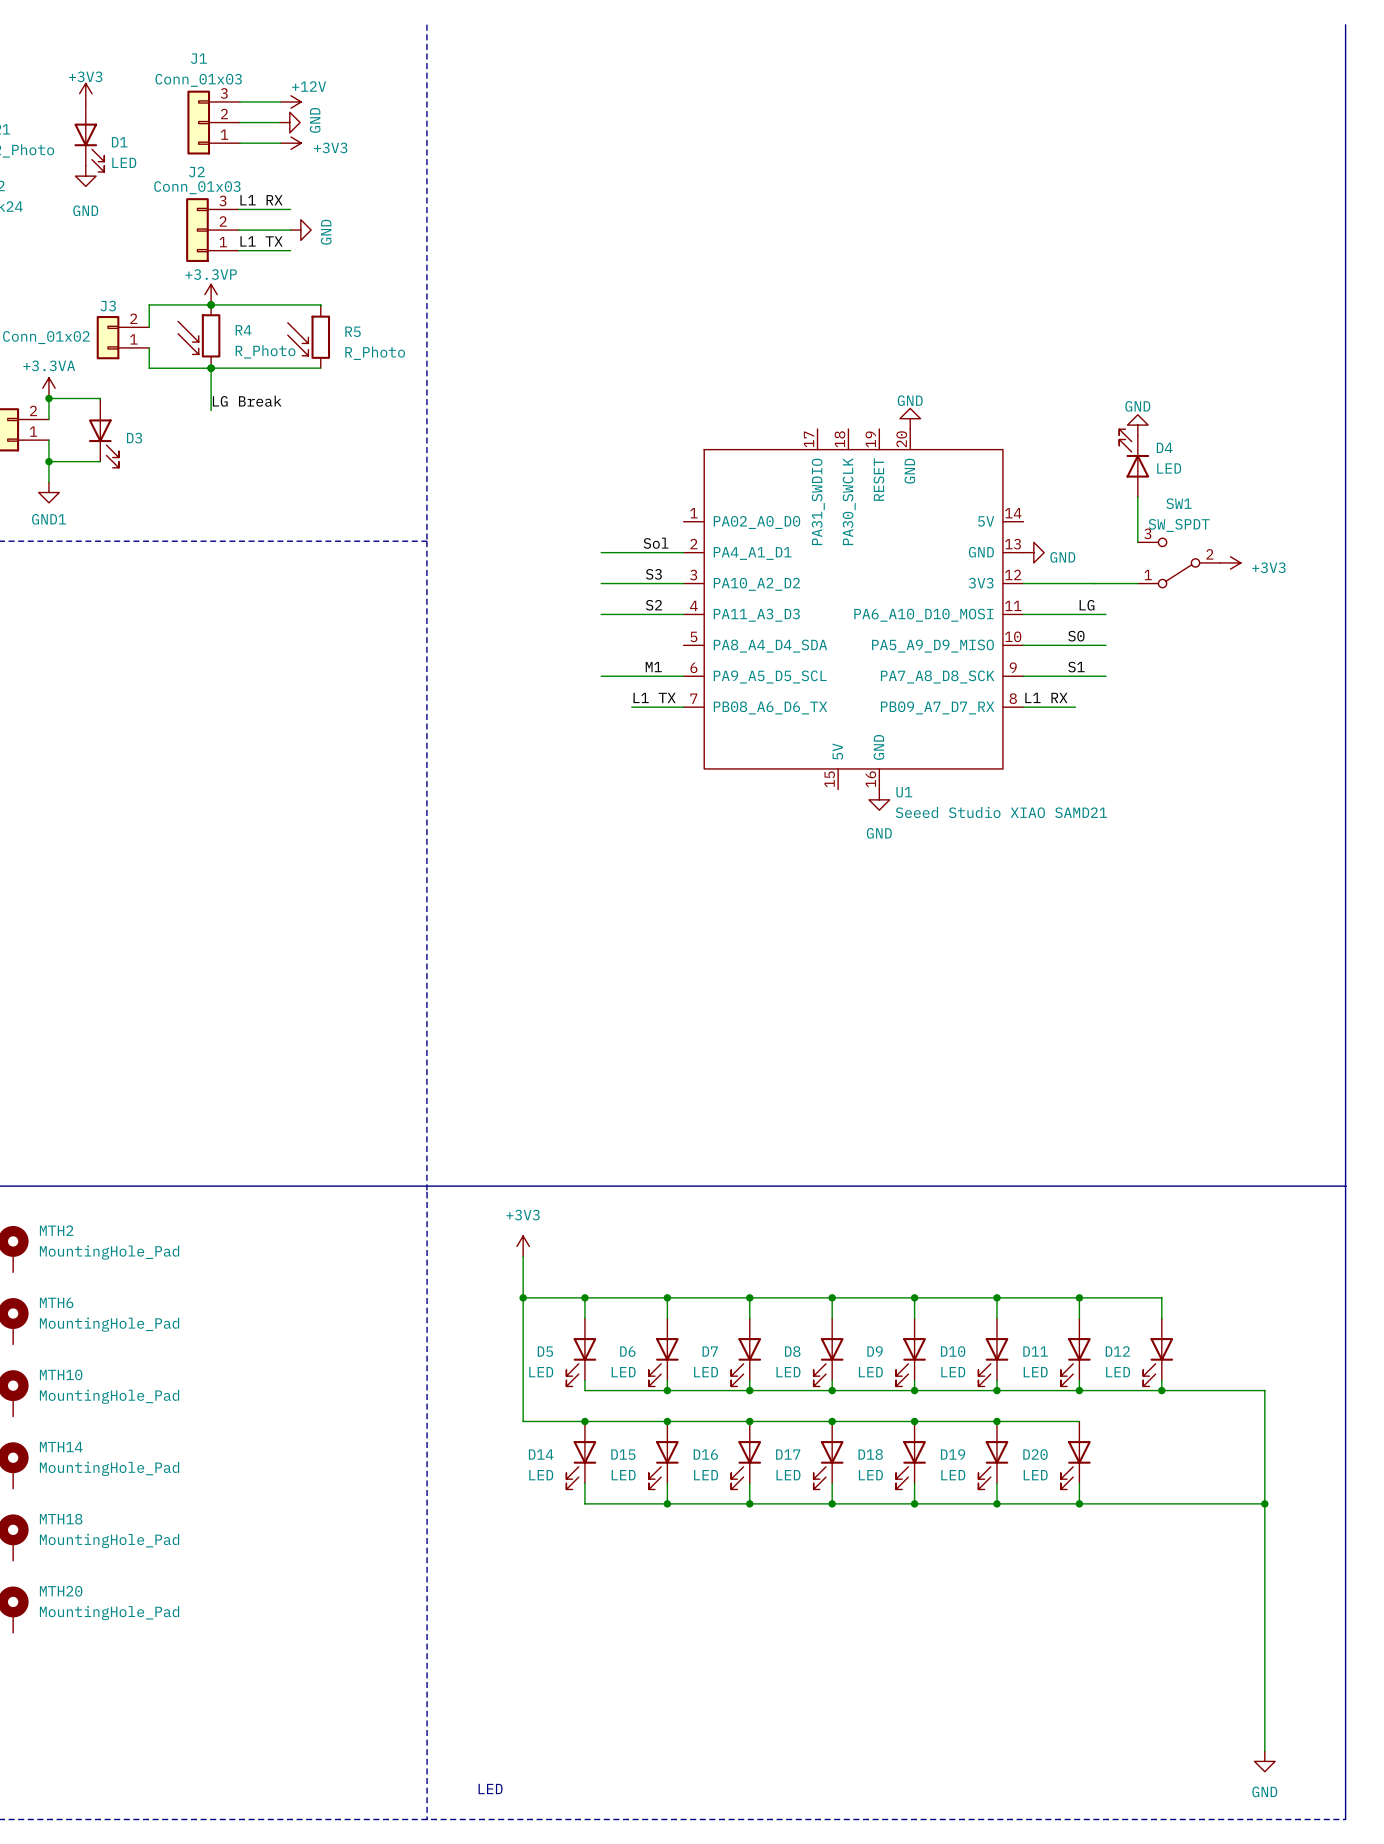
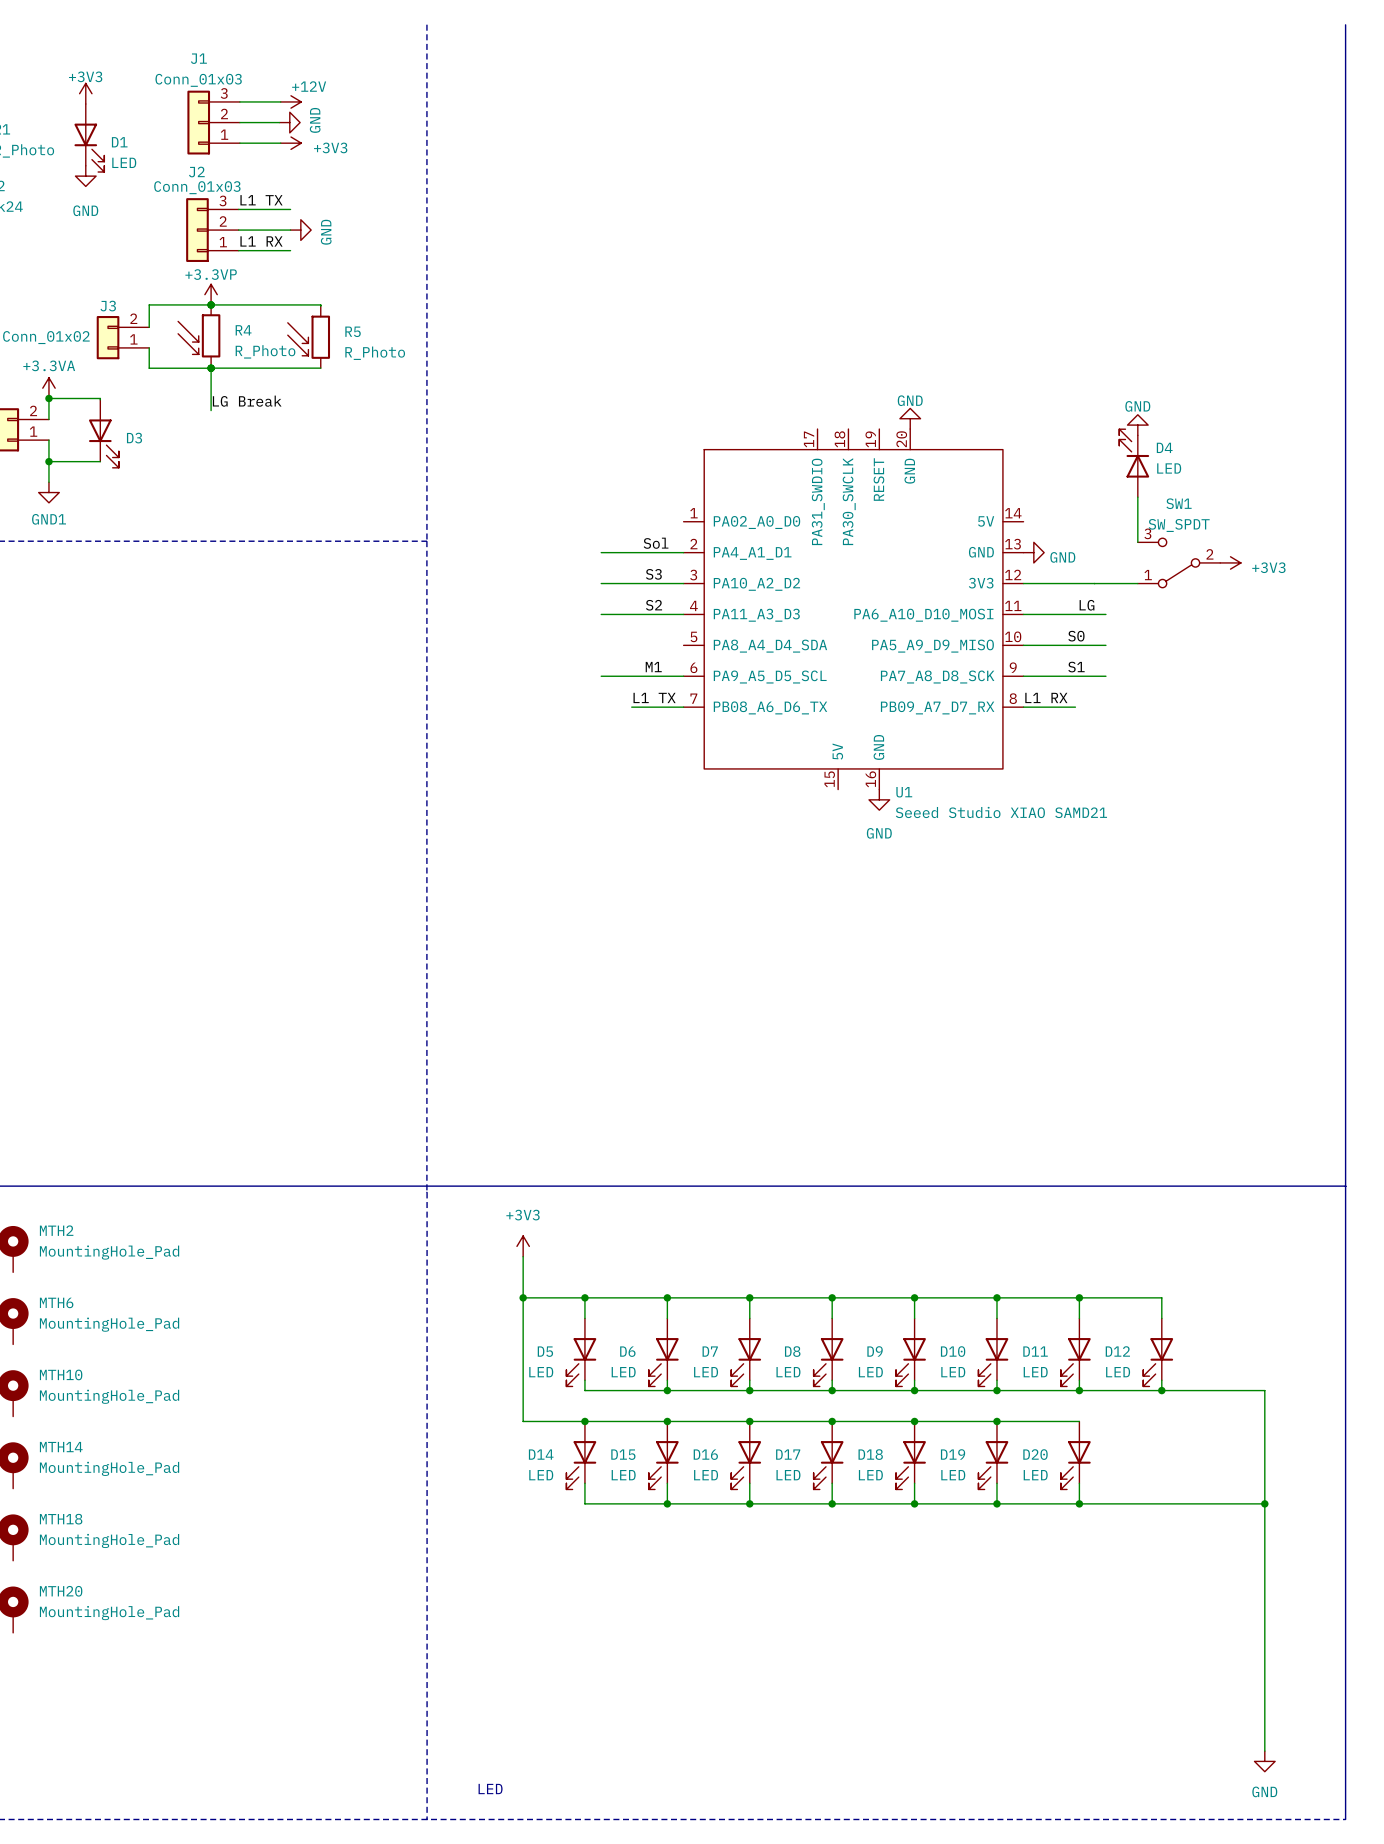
label: L1 RX (261, 200) -> L1 TX (261, 200)
label: L1 TX (261, 241) -> L1 RX (261, 241)

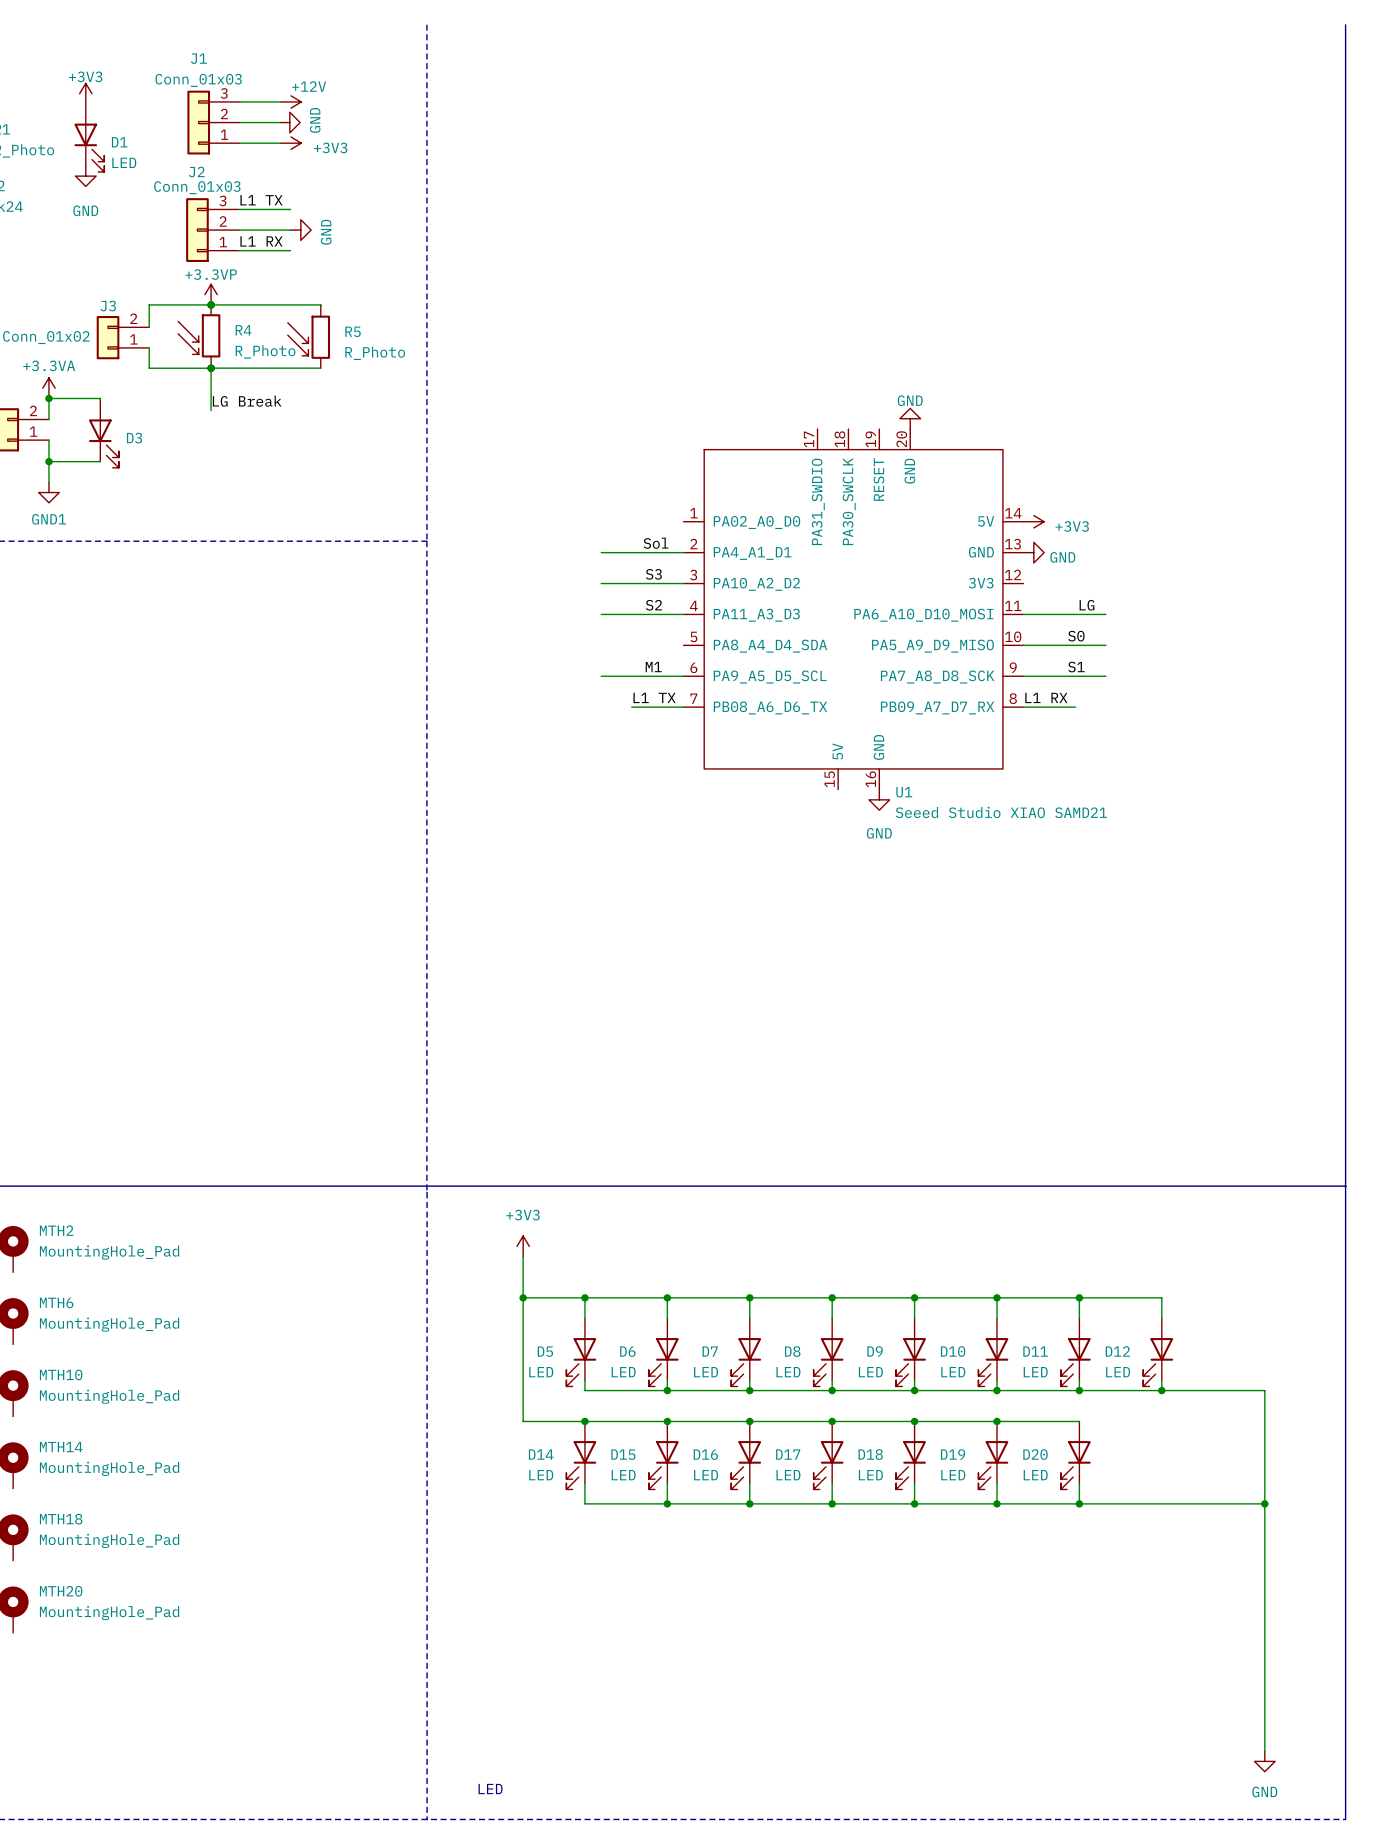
power symbol: GND (1137, 425) -> none
D4: LED (1134, 463) -> none
wire: (1137, 497) (1137, 542) -> none
SW1: SW_SPDT (1179, 562) -> none
power symbol position: +3V3 (1230, 562) -> +3V3 (1033, 521)
wire: (1023, 583) (1094, 583) -> none
wire: (1094, 583) (1137, 583) -> none

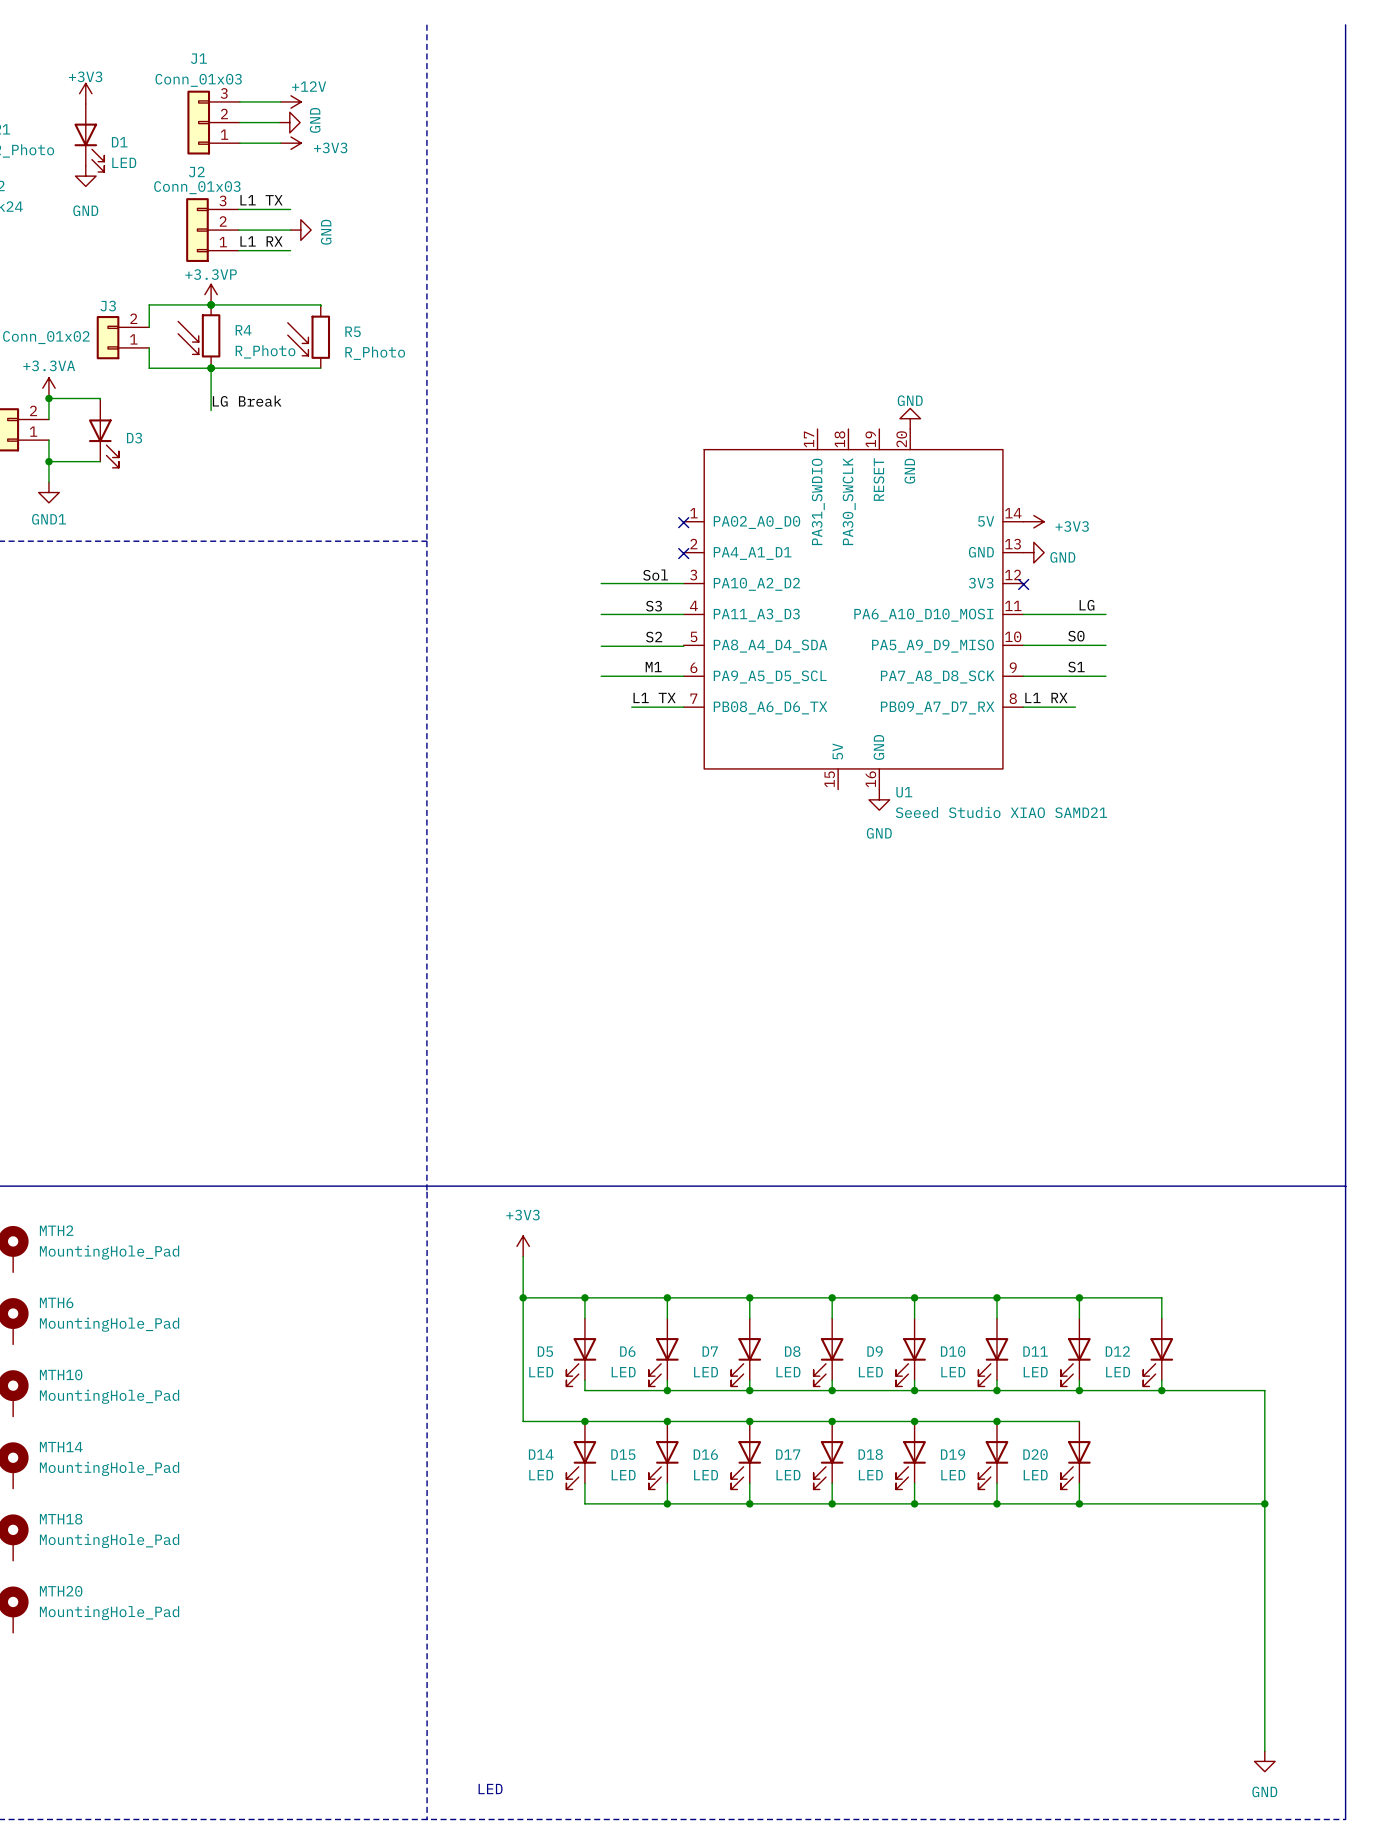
no-connect mark: none -> (683, 522)
label position: Sol (656, 543) -> Sol (655, 575)
wire: (601, 552) (683, 552) -> (601, 646) (683, 646)
no-connect mark: none -> (683, 553)
label: S3 (653, 574) -> none
no-connect mark: none -> (1023, 584)
label: S2 (654, 605) -> S3 (654, 606)
label: none -> S2 (654, 637)

